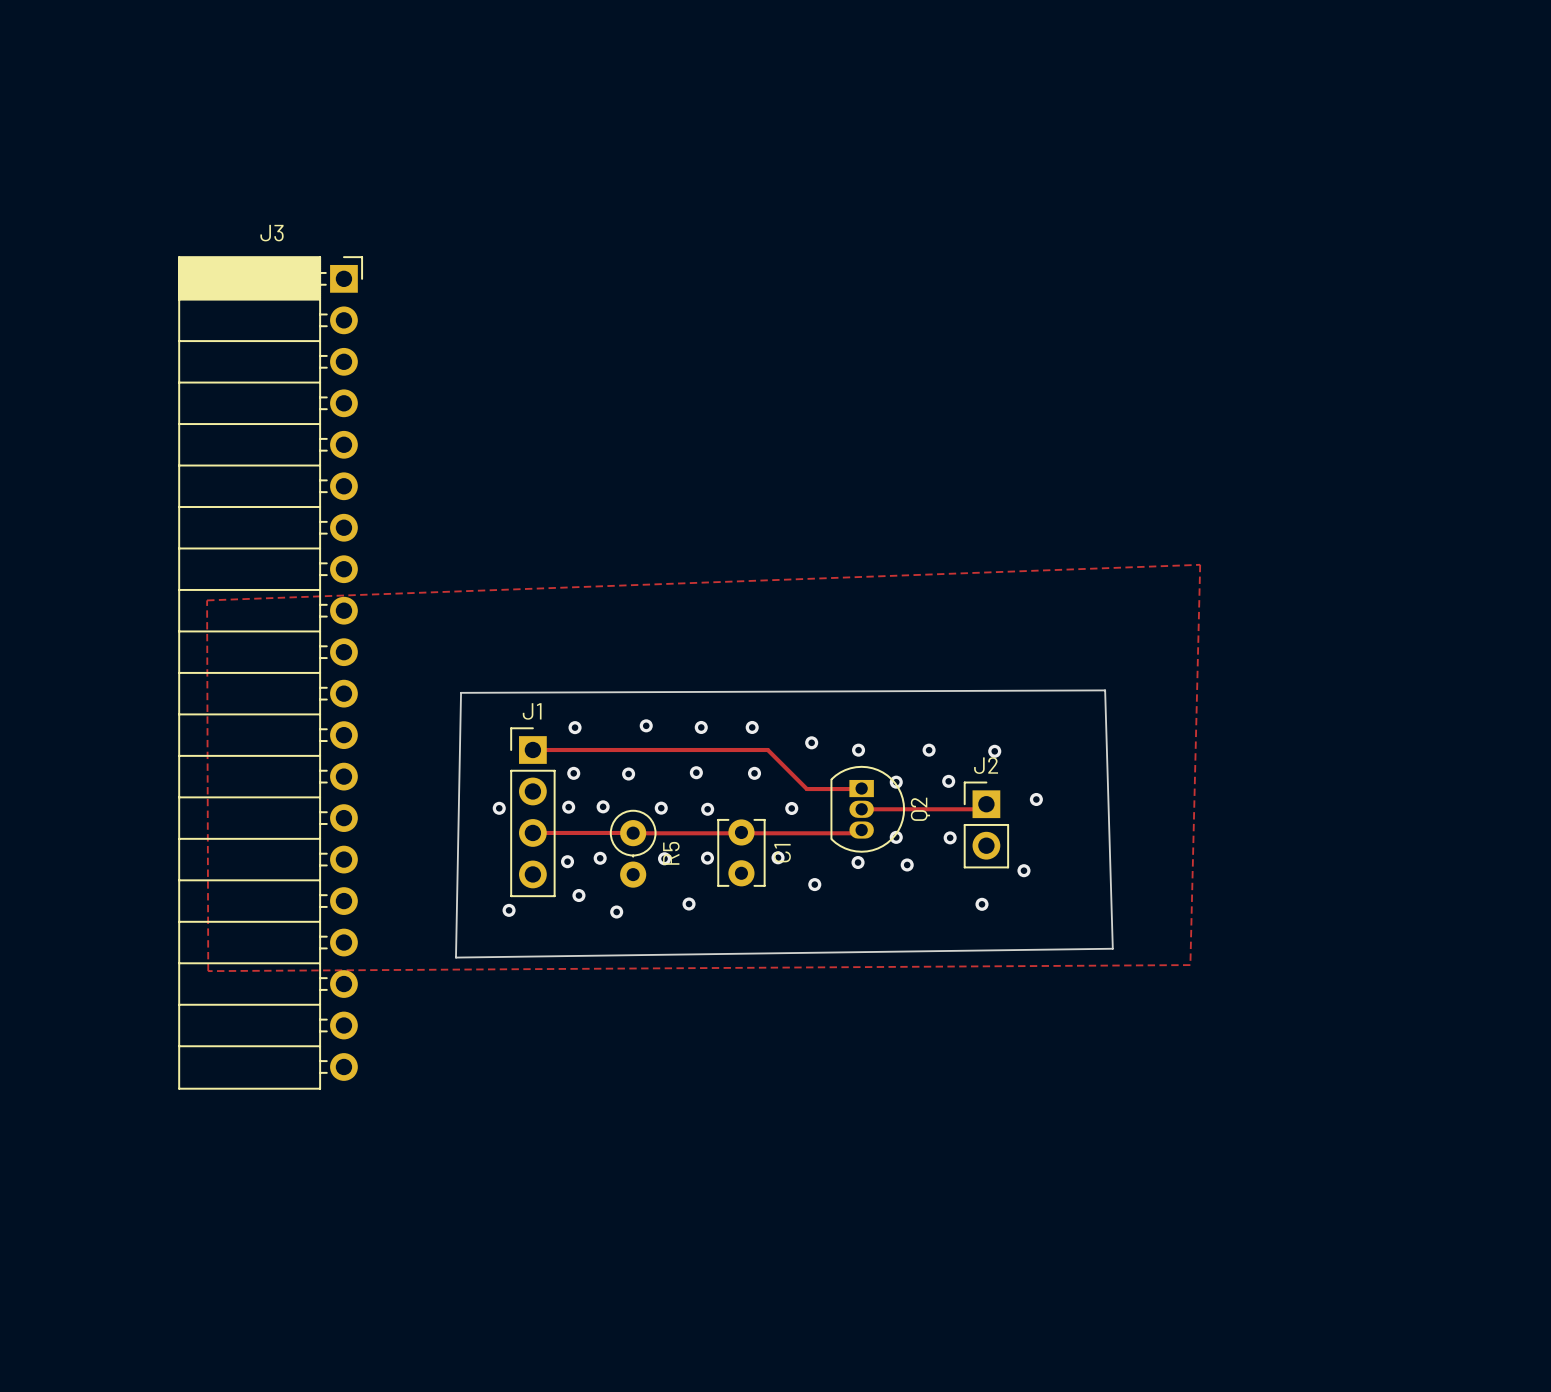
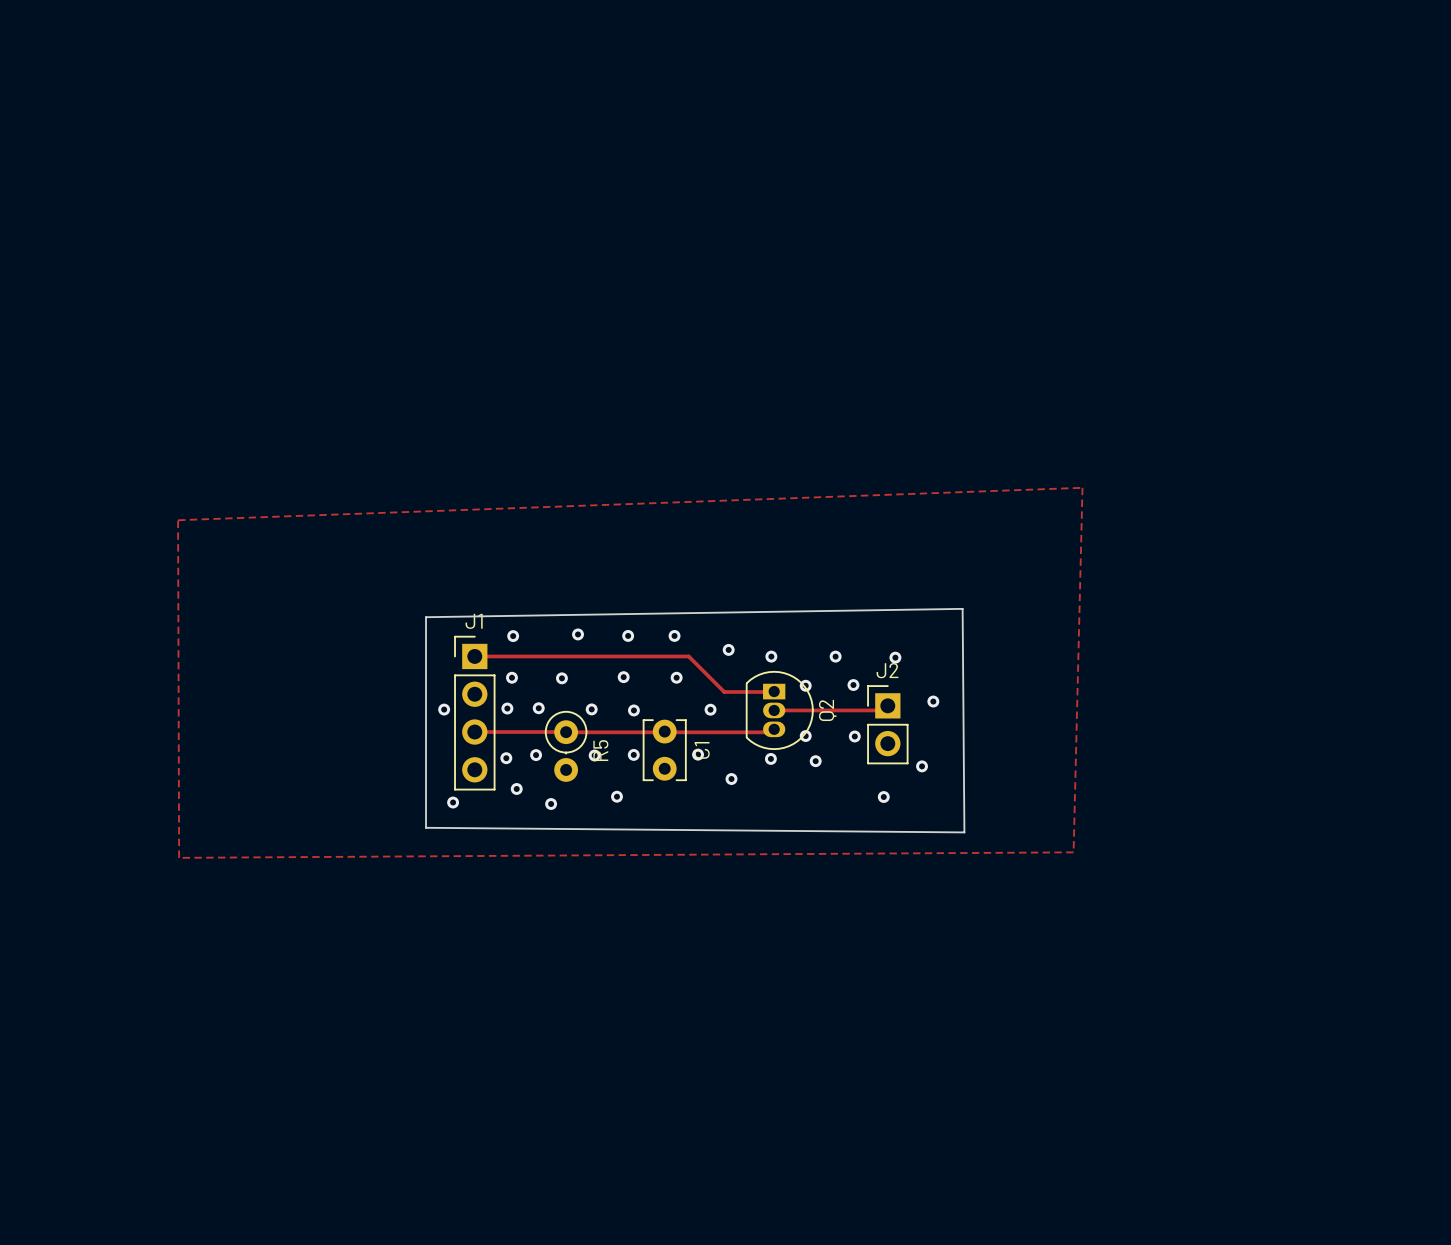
J3: (270, 672) -> none
board edge: (1105, 690) (1112, 948) (455, 957) (461, 692) (1105, 690) -> (962, 608) (426, 617) (426, 827) (964, 832) (962, 608)

